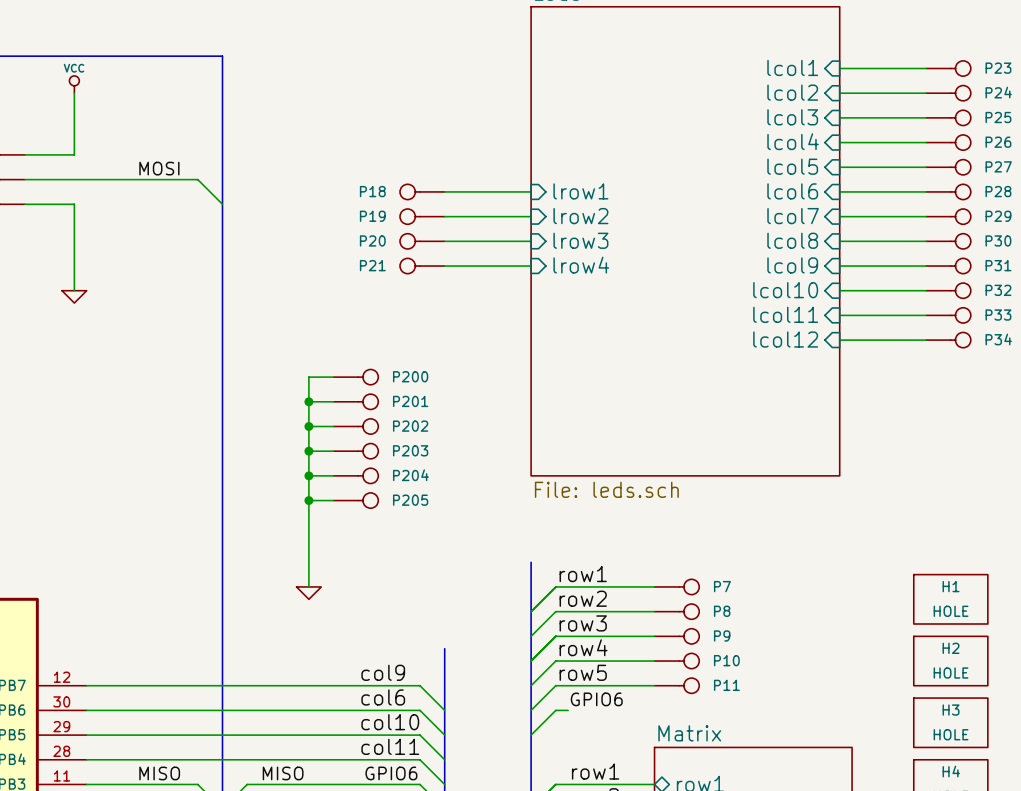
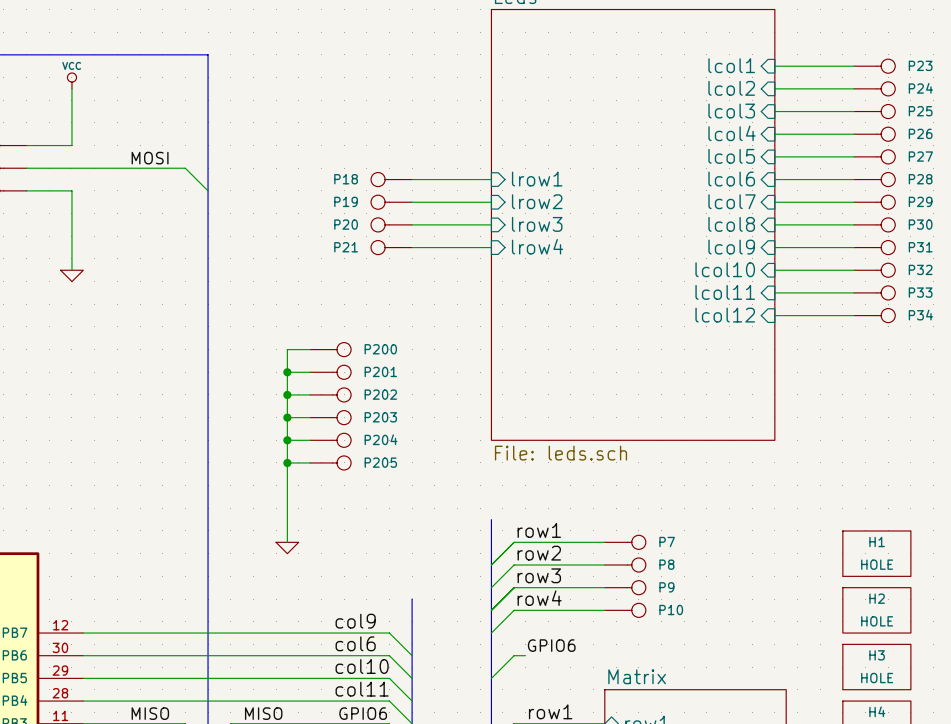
label: row5 (583, 672) -> none
wire: (654, 685) (555, 685) (531, 710) -> none
P11: (676, 685) -> none

